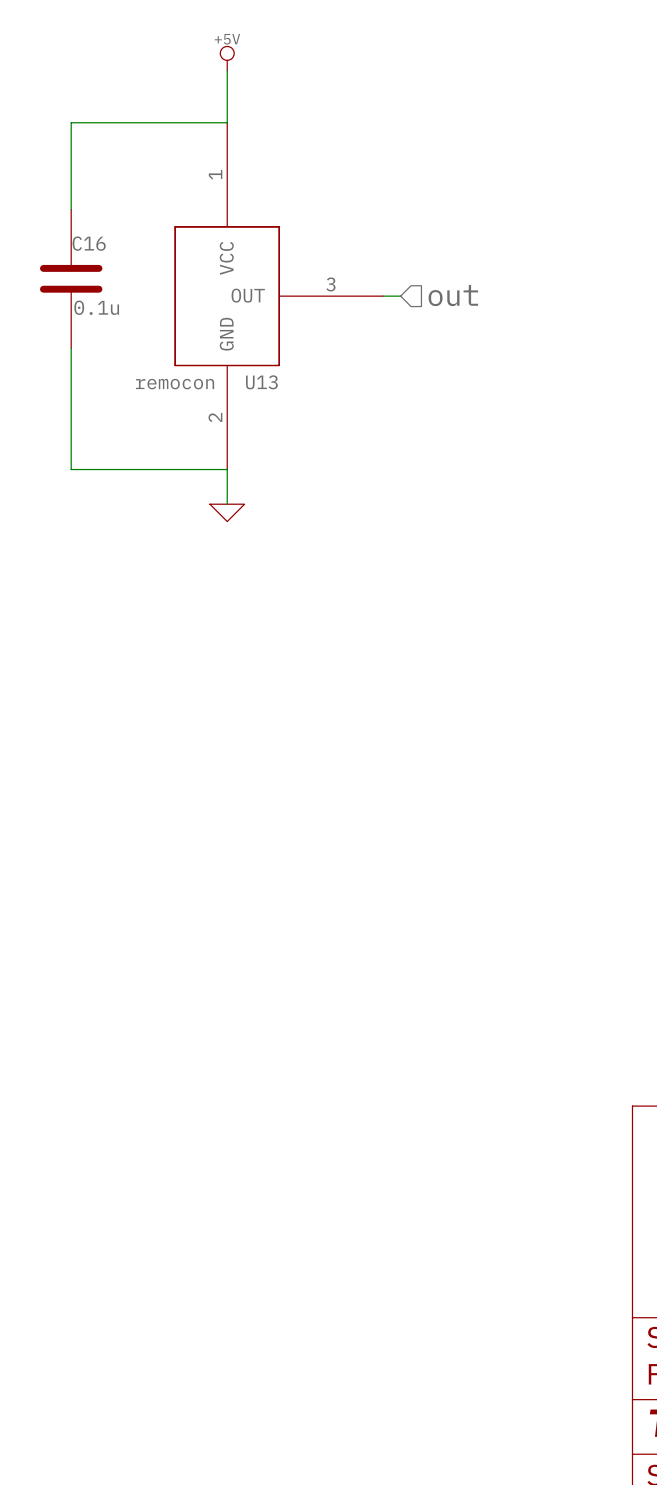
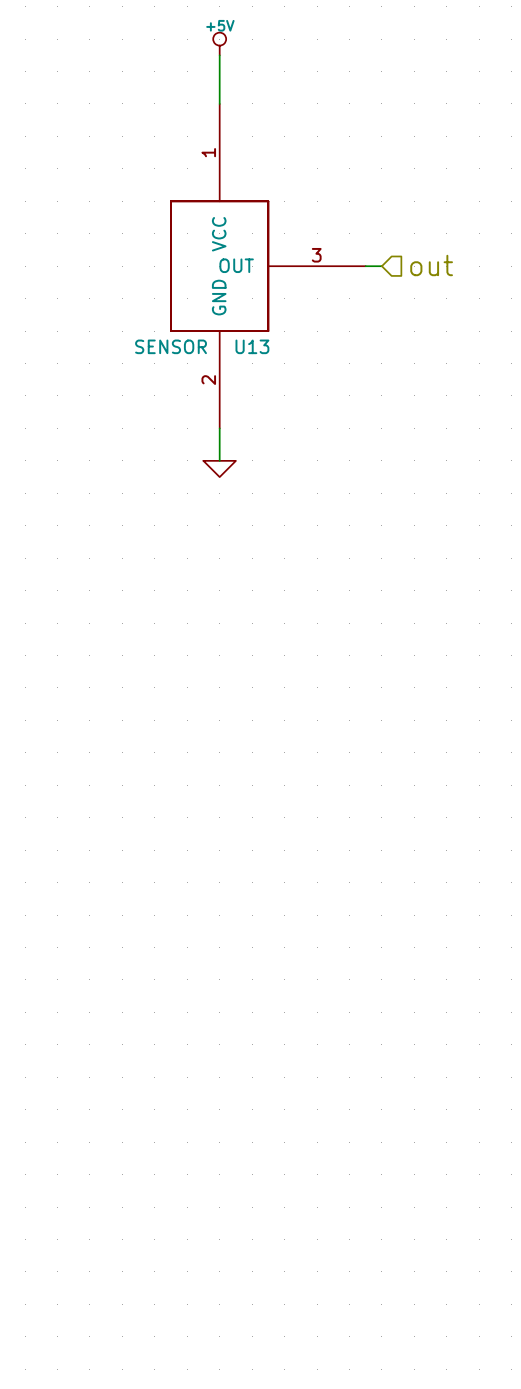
wire: (227, 122) (71, 122) (71, 209) -> none
C16: 0.1u (71, 278) -> none
wire: (71, 348) (71, 469) (227, 469) -> none
U13 value: remocon (175, 384) -> SENSOR (171, 346)

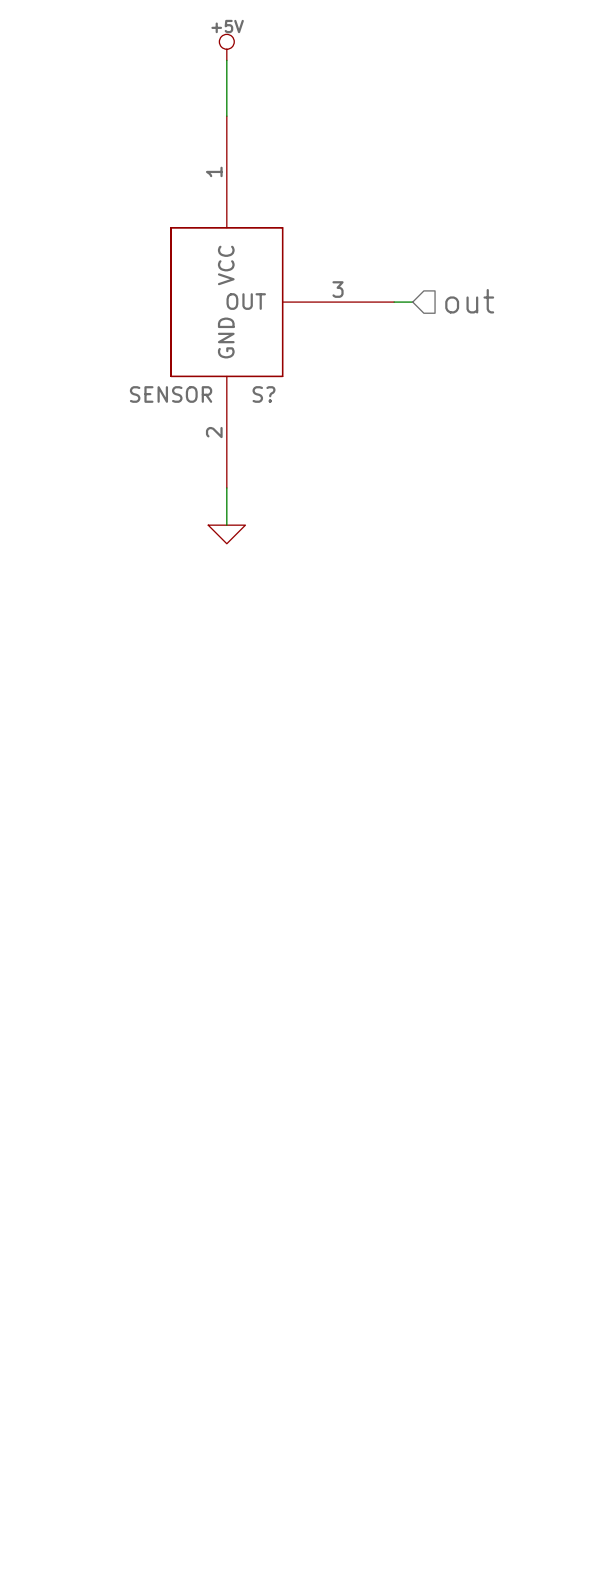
U13 name: U13 (252, 346) -> S? (264, 394)

